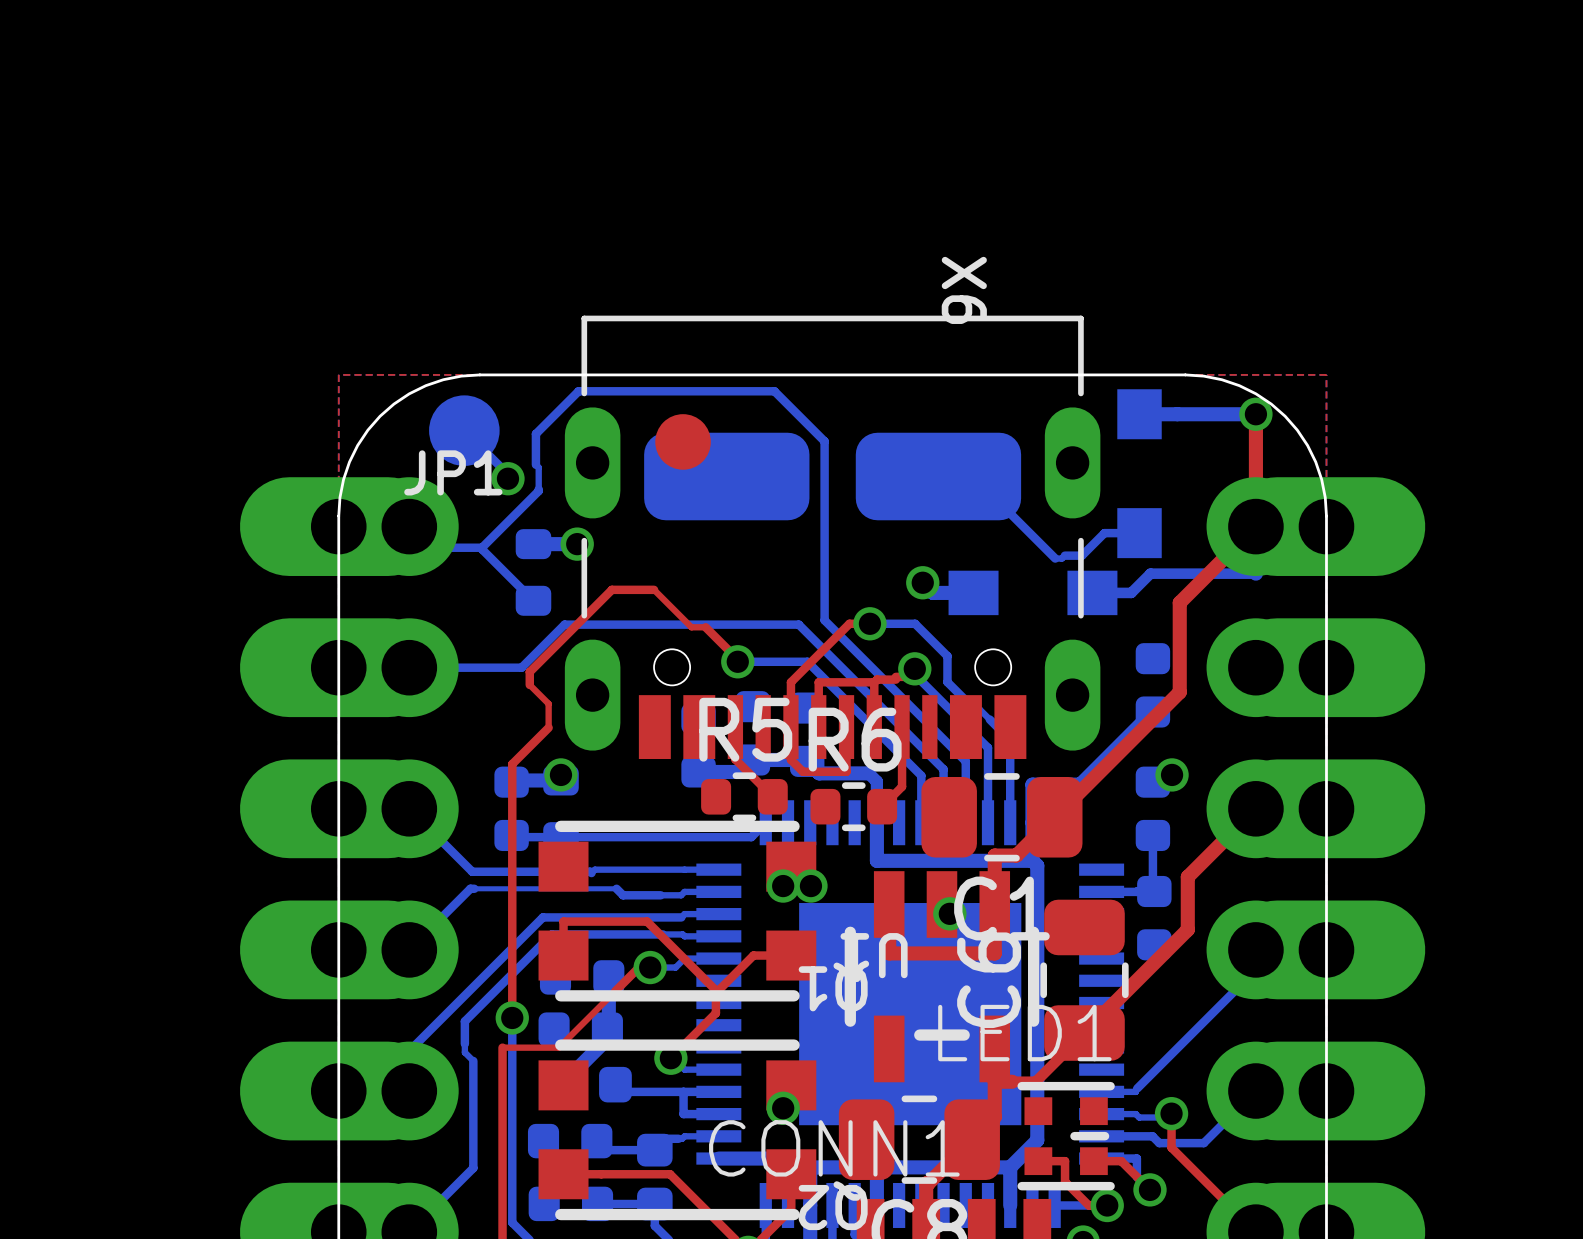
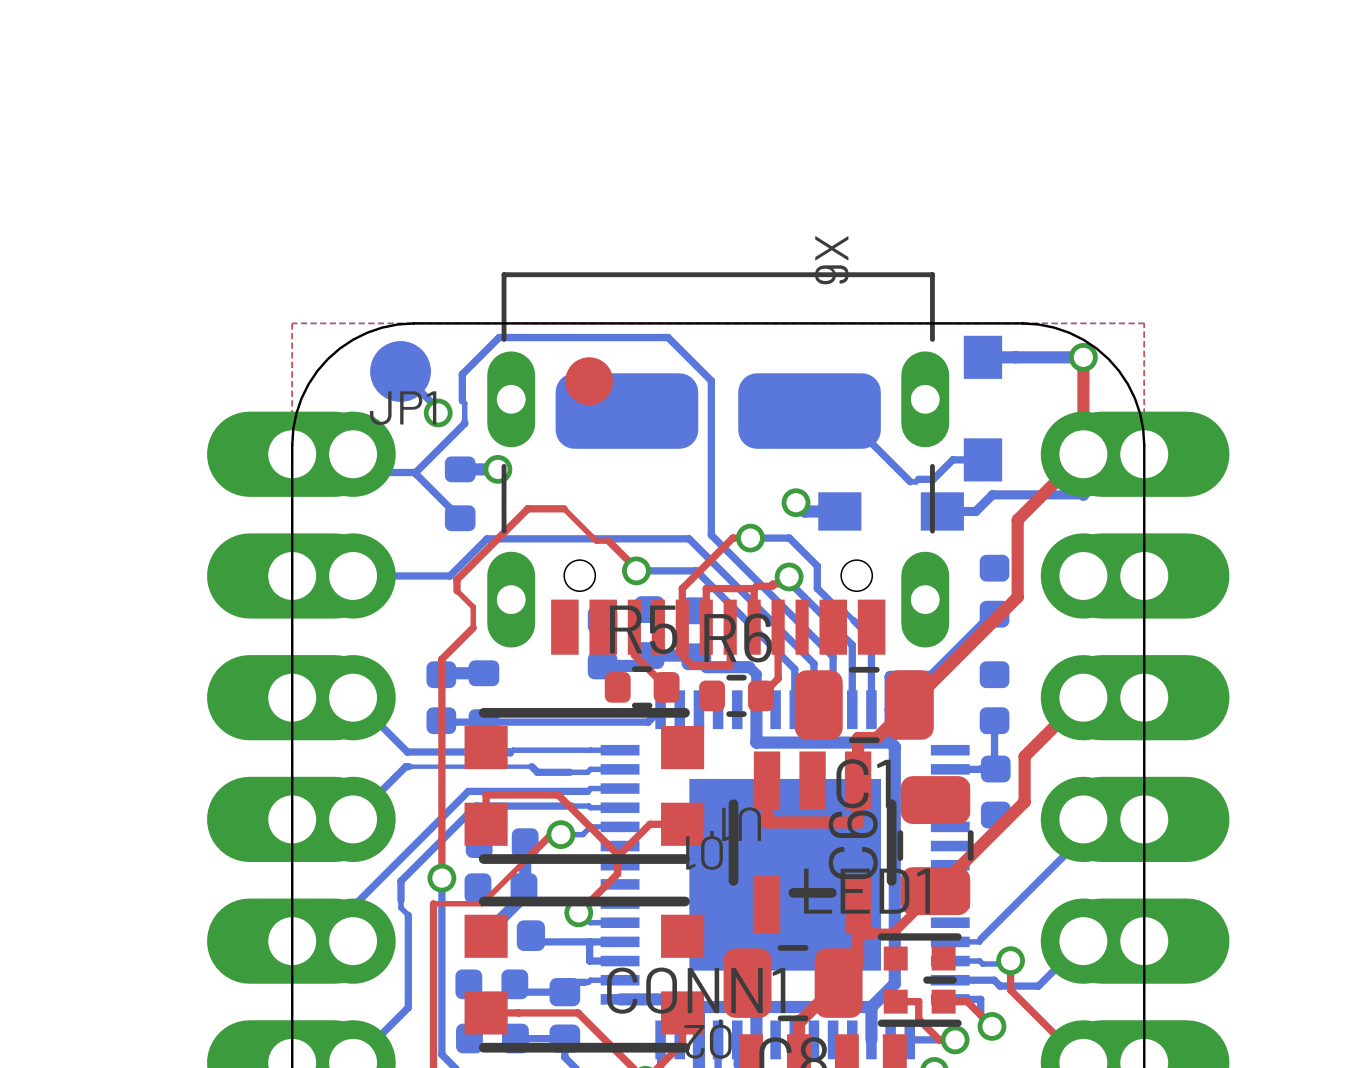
via: (560, 774) -> none
via: (1172, 774) -> none
via: (783, 886) -> none
via: (810, 886) -> none
via: (949, 913) -> none
via: (783, 1108) -> none

